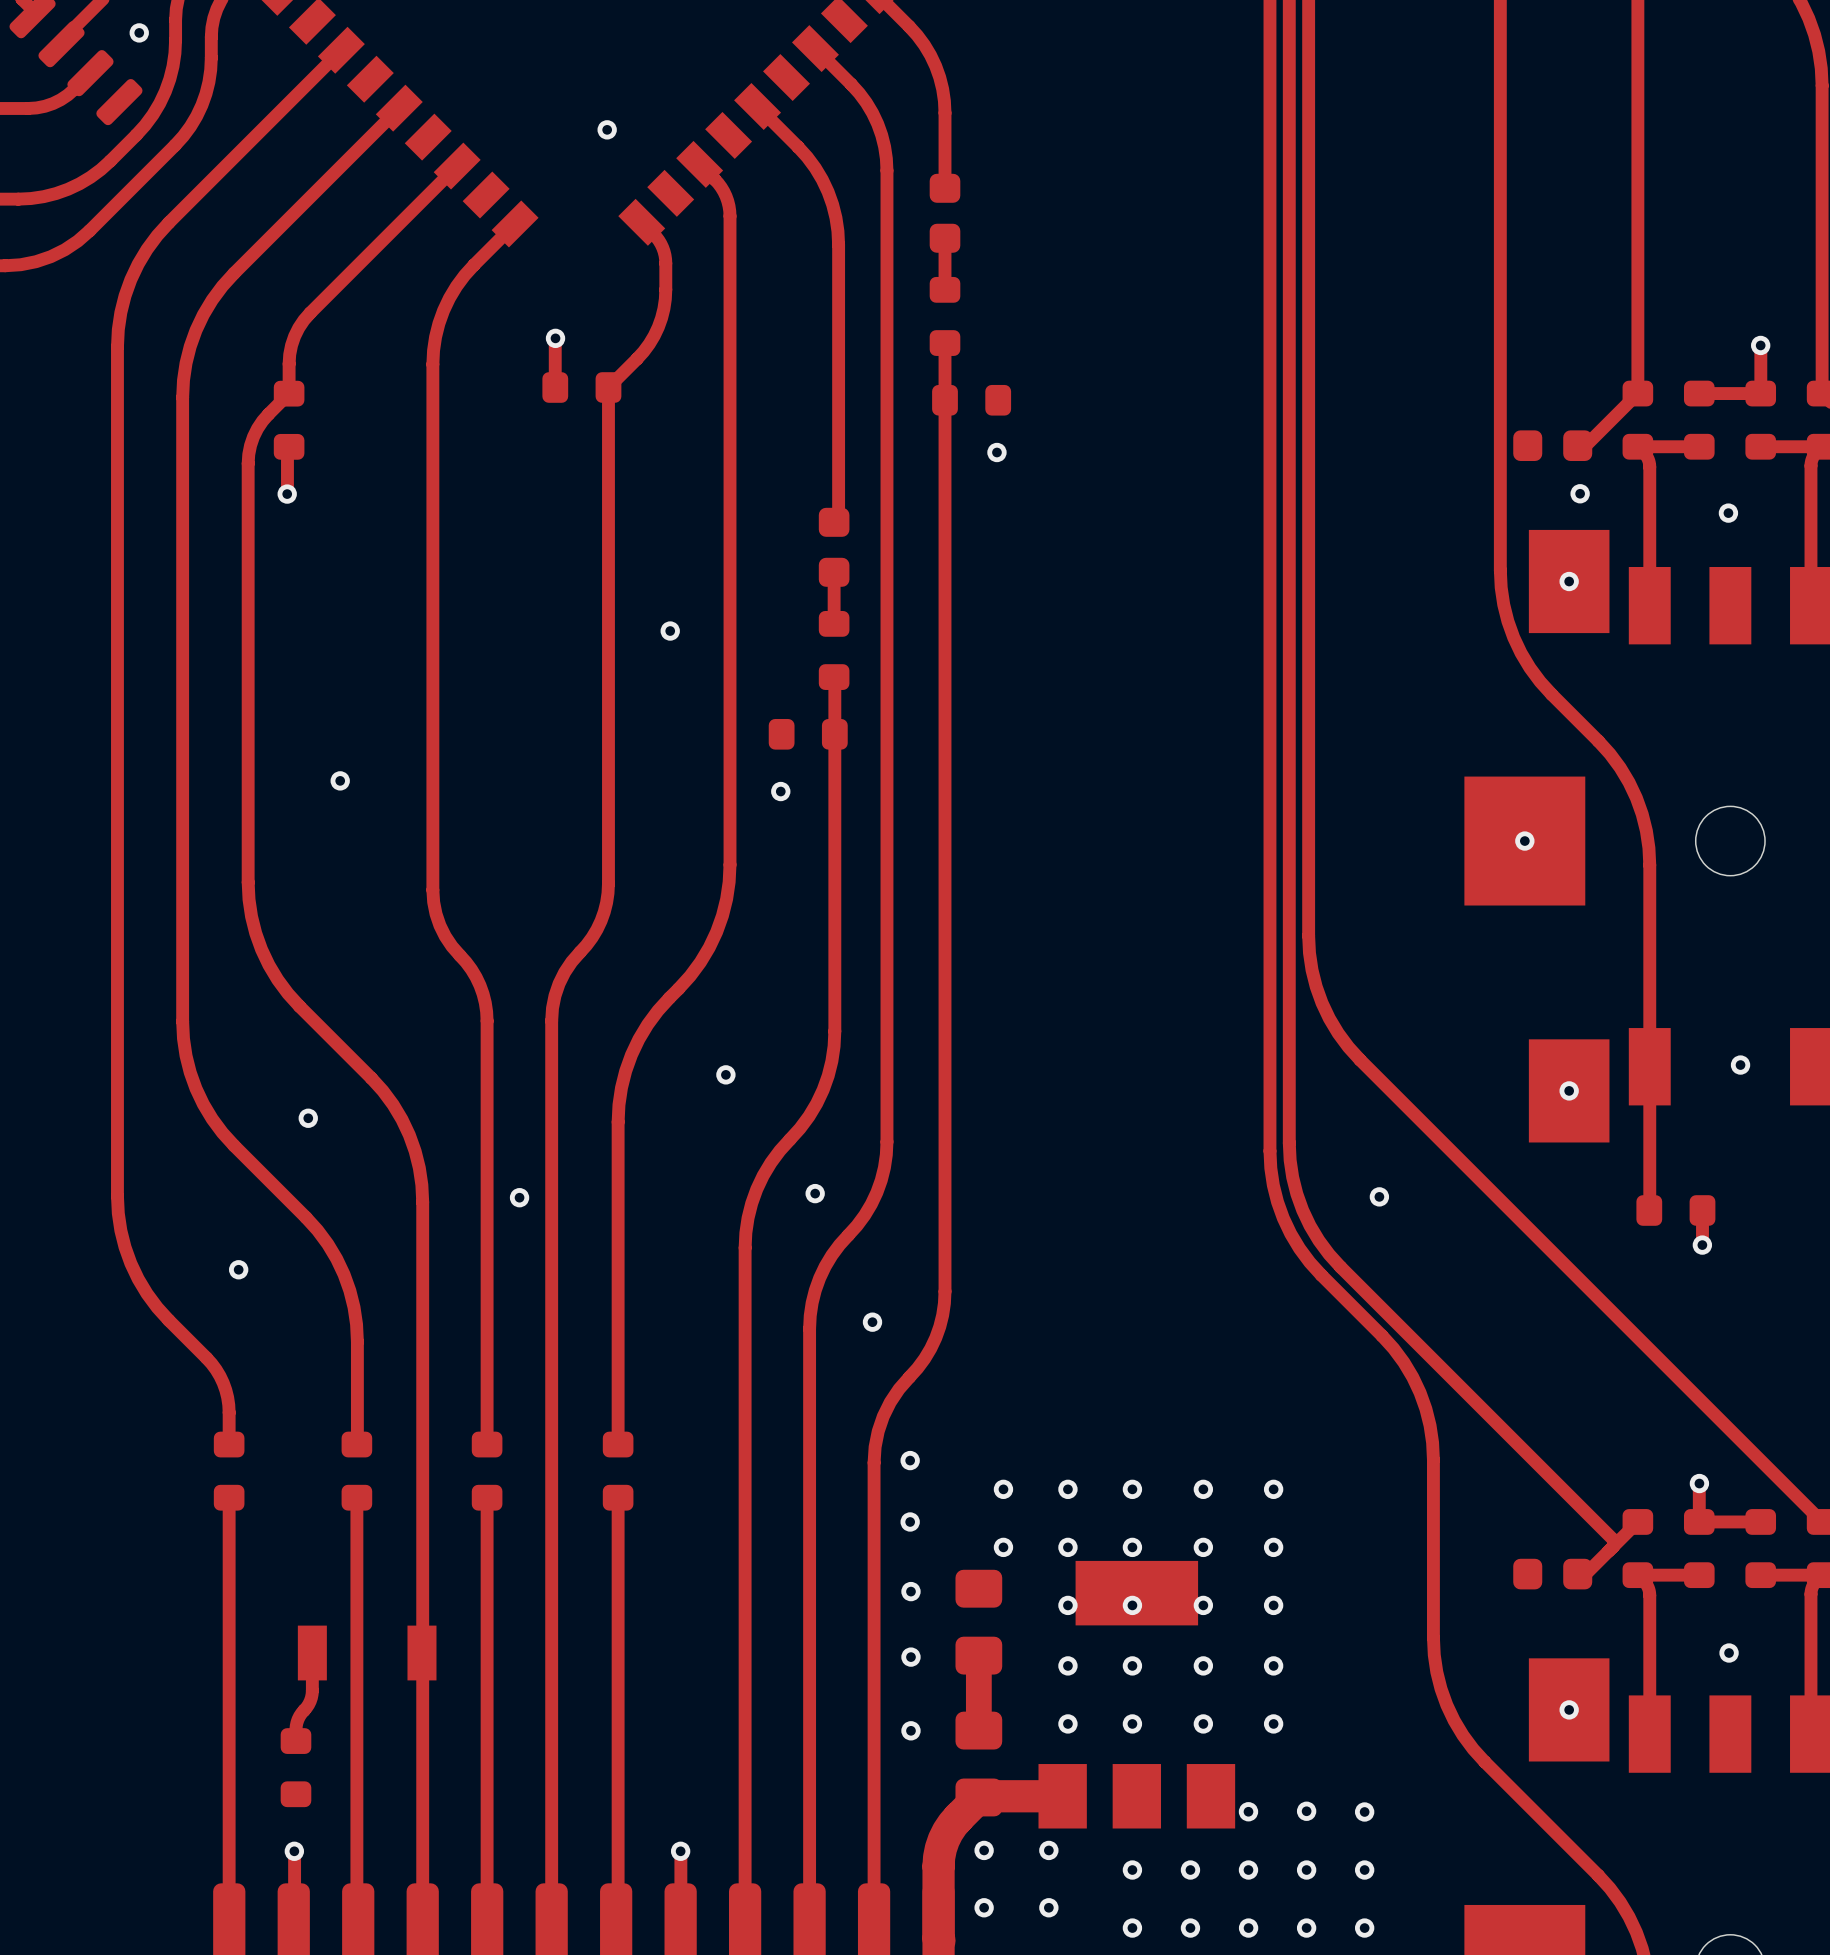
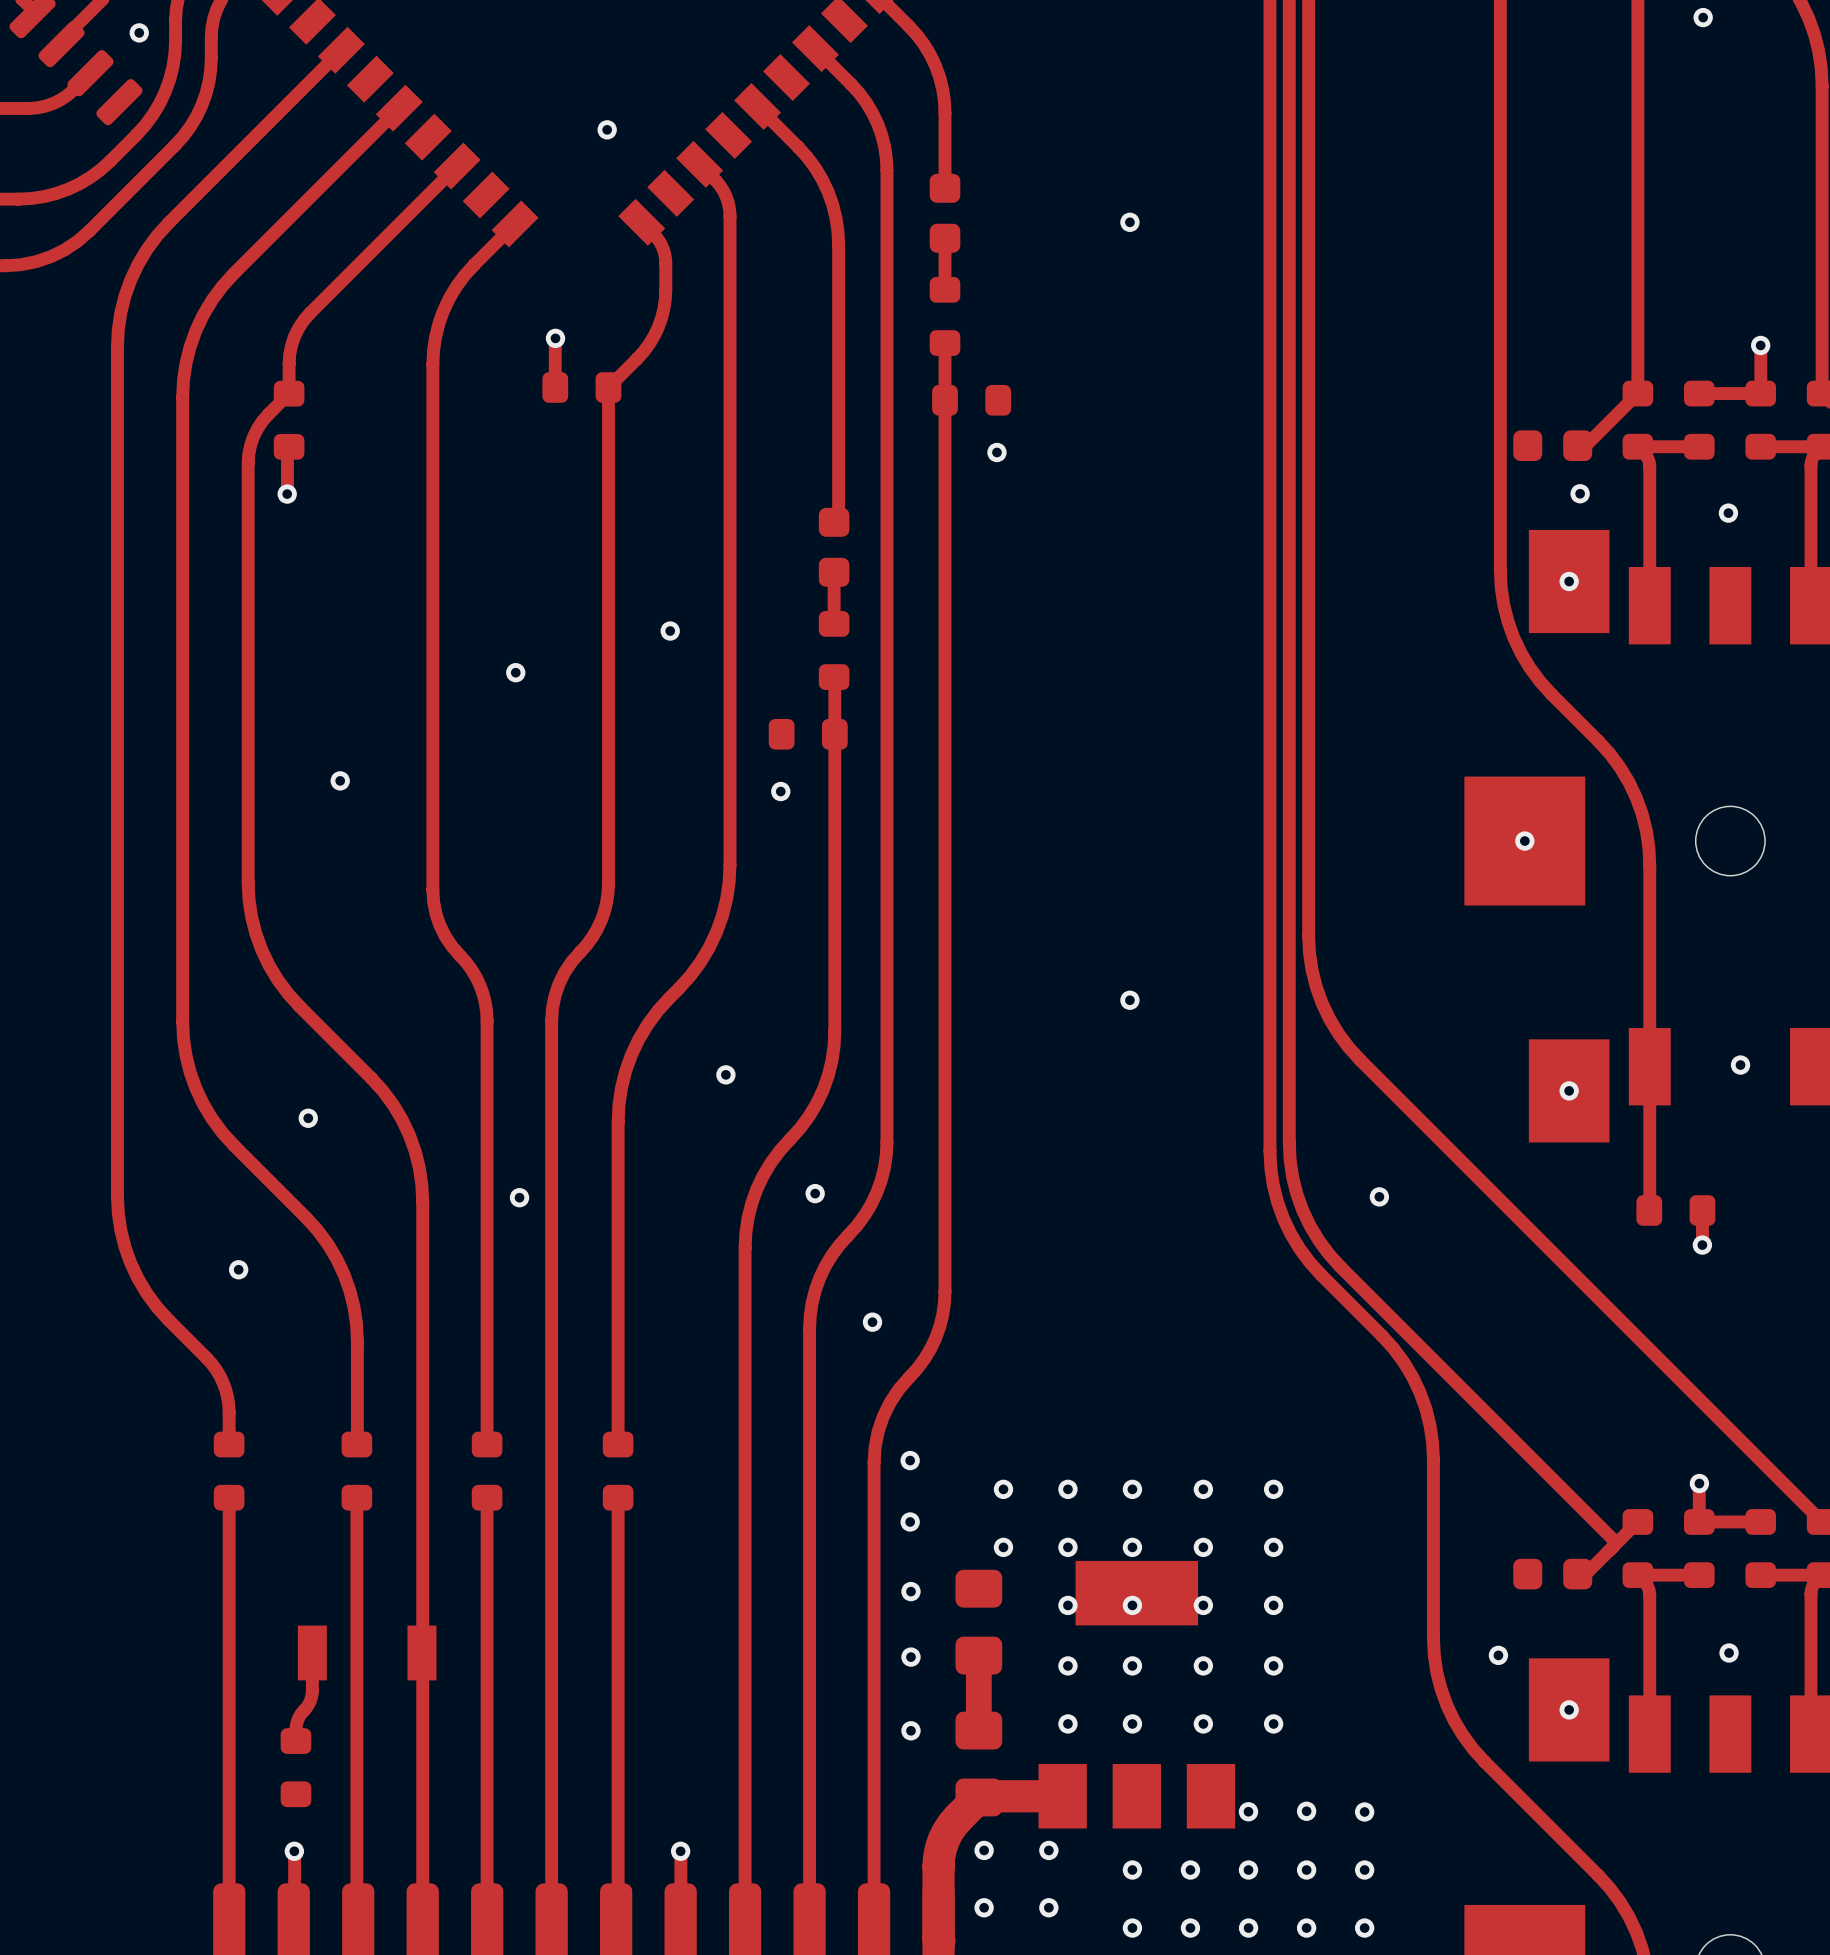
via: none -> (1703, 17)
via: none -> (1129, 222)
via: none -> (515, 672)
via: none -> (1129, 1000)
via: none -> (1498, 1655)

